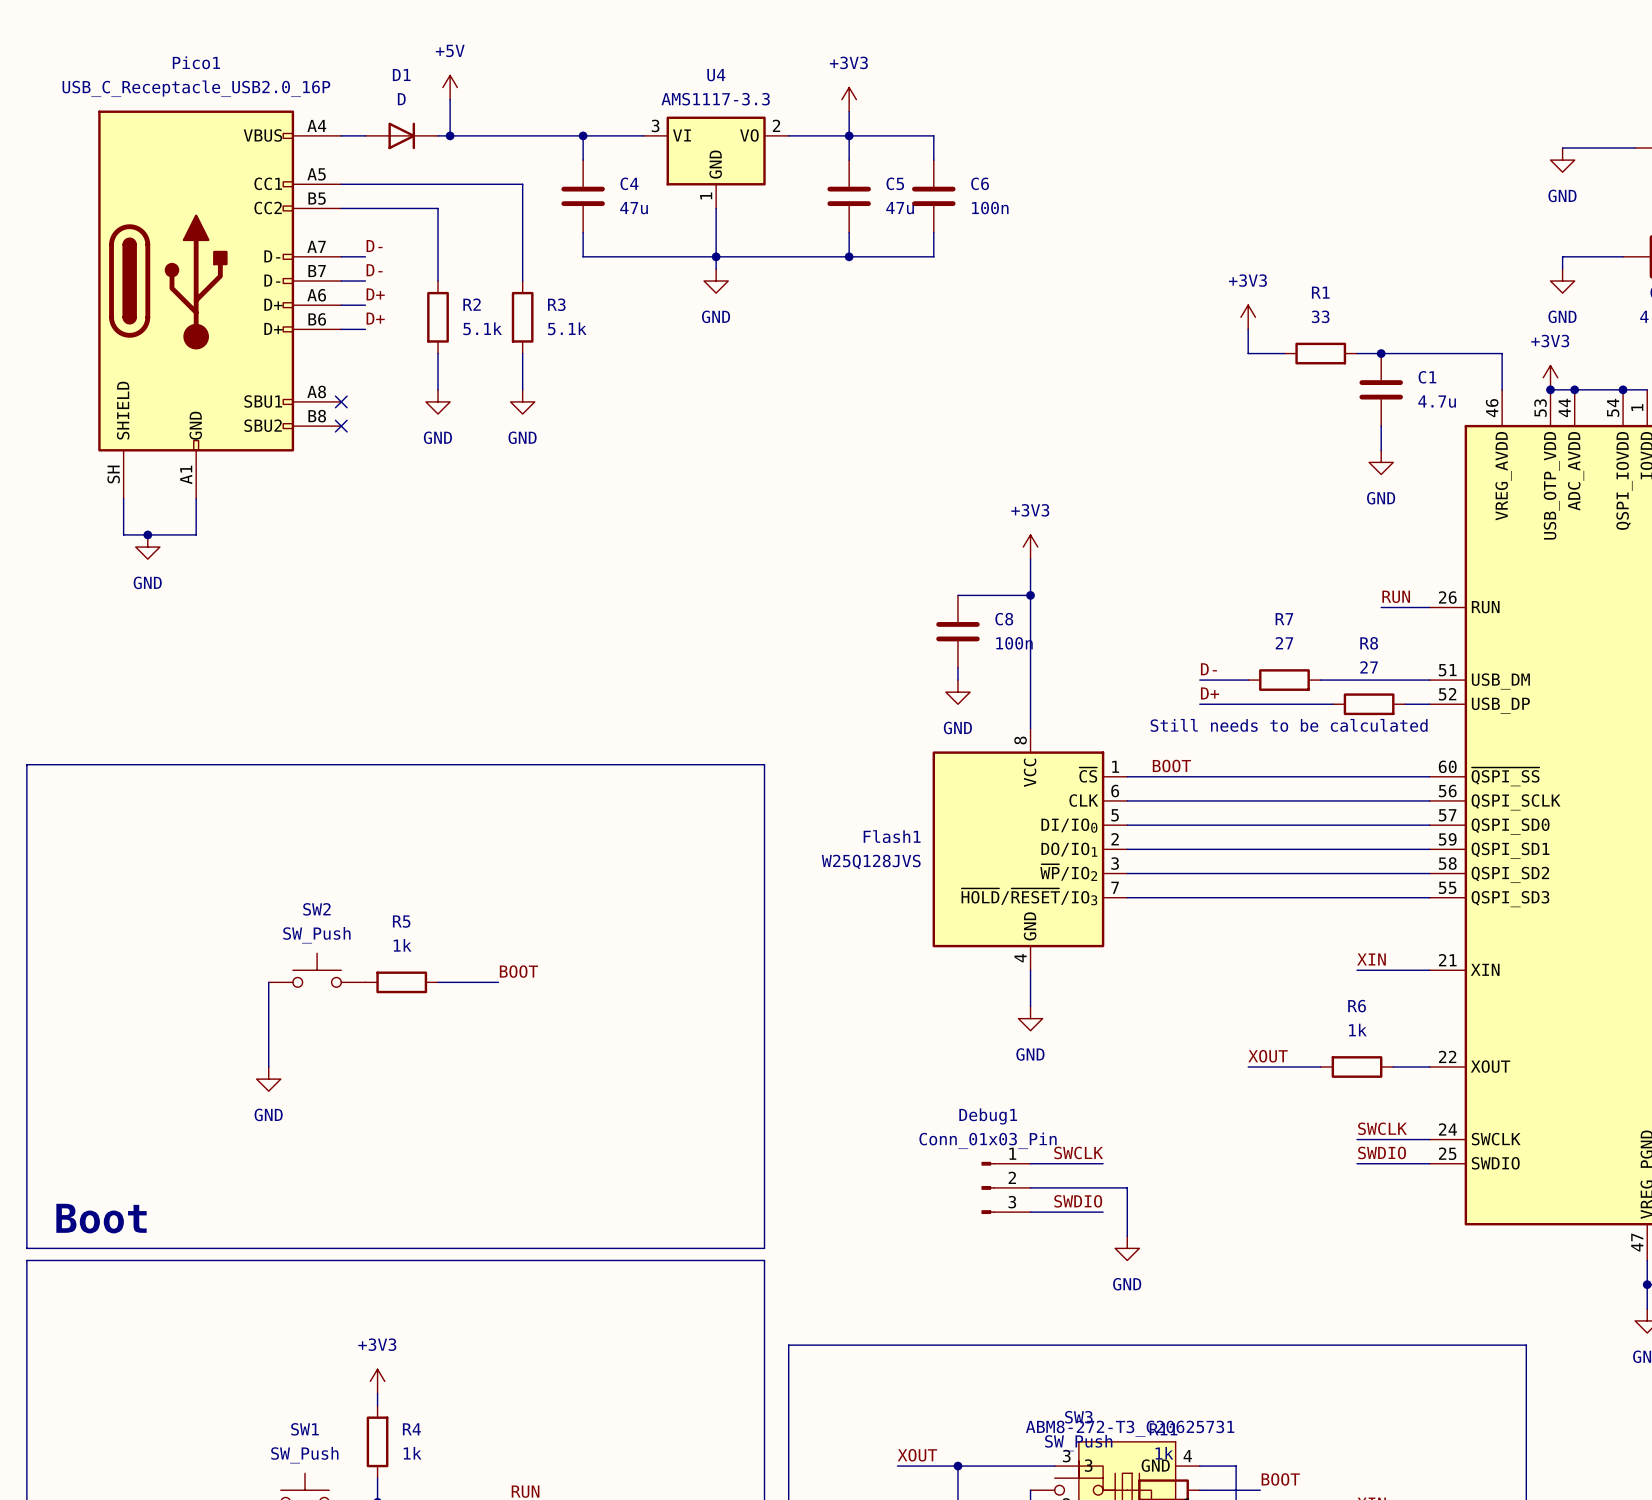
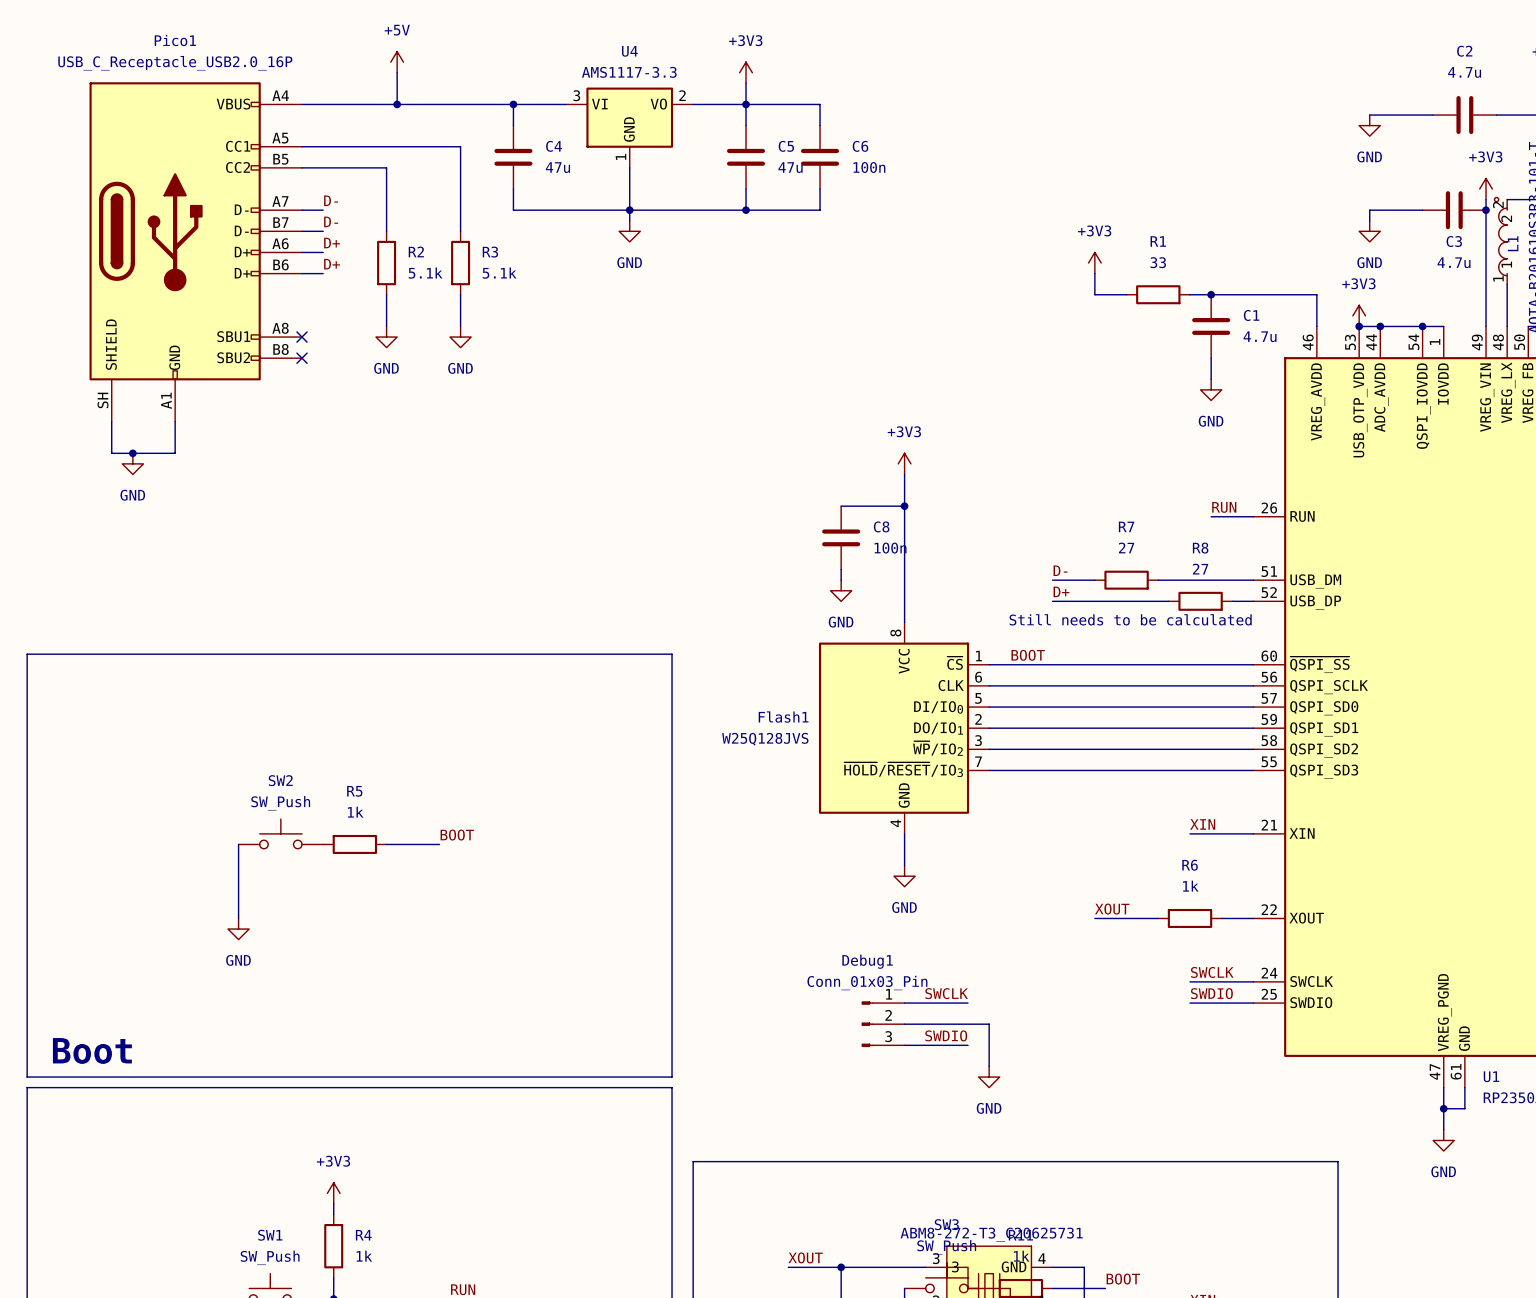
D1: D (401, 135) -> none

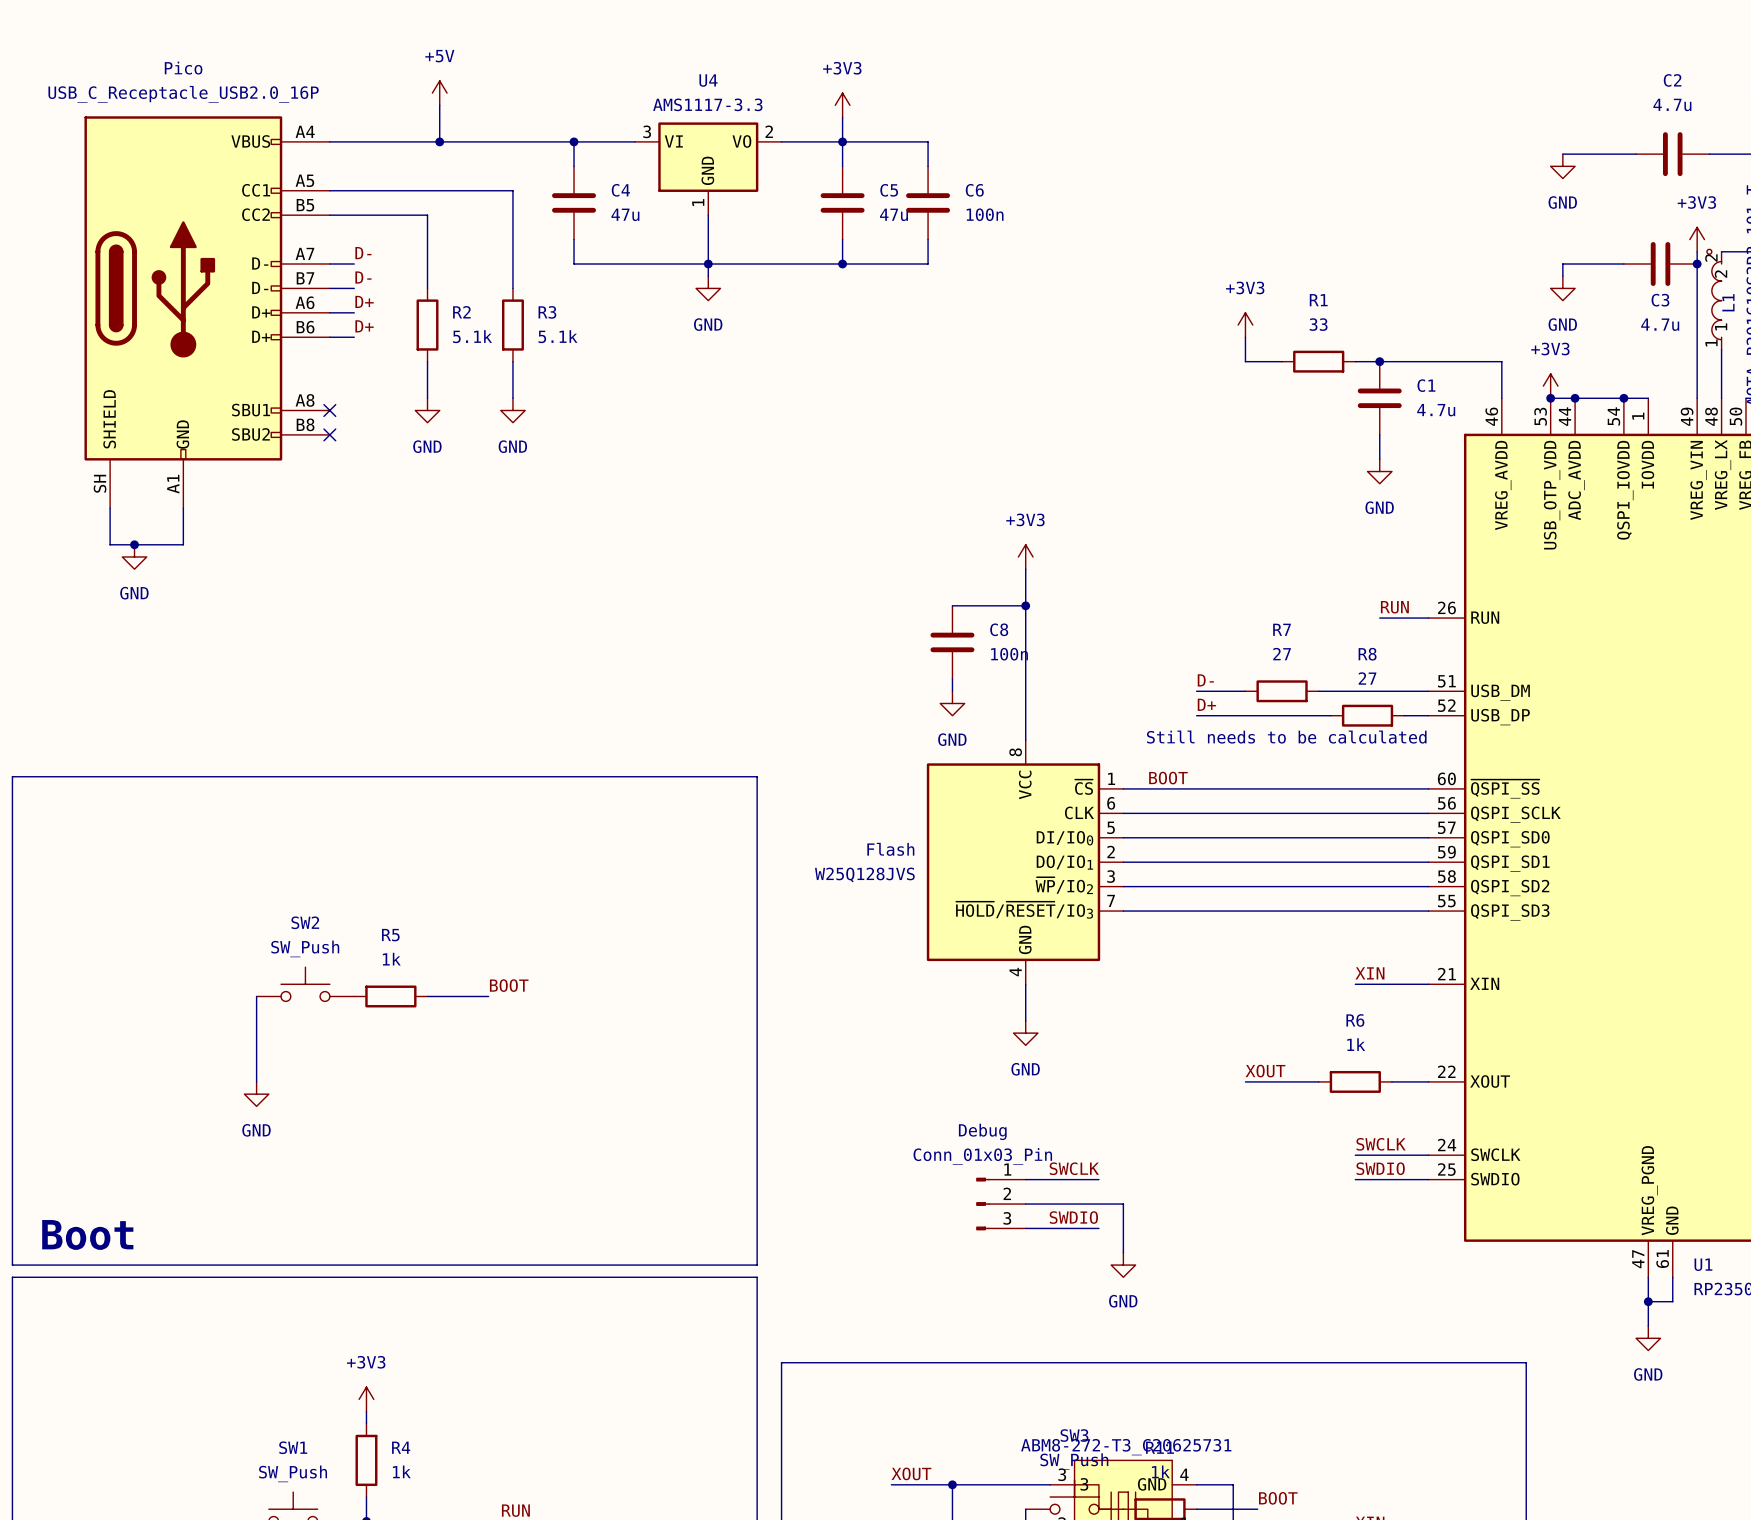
Pico1 name: Pico1 (175, 40) -> Pico (183, 68)
Flash1 name: Flash1 (783, 717) -> Flash (890, 849)
Debug1 name: Debug1 (867, 961) -> Debug (982, 1131)

